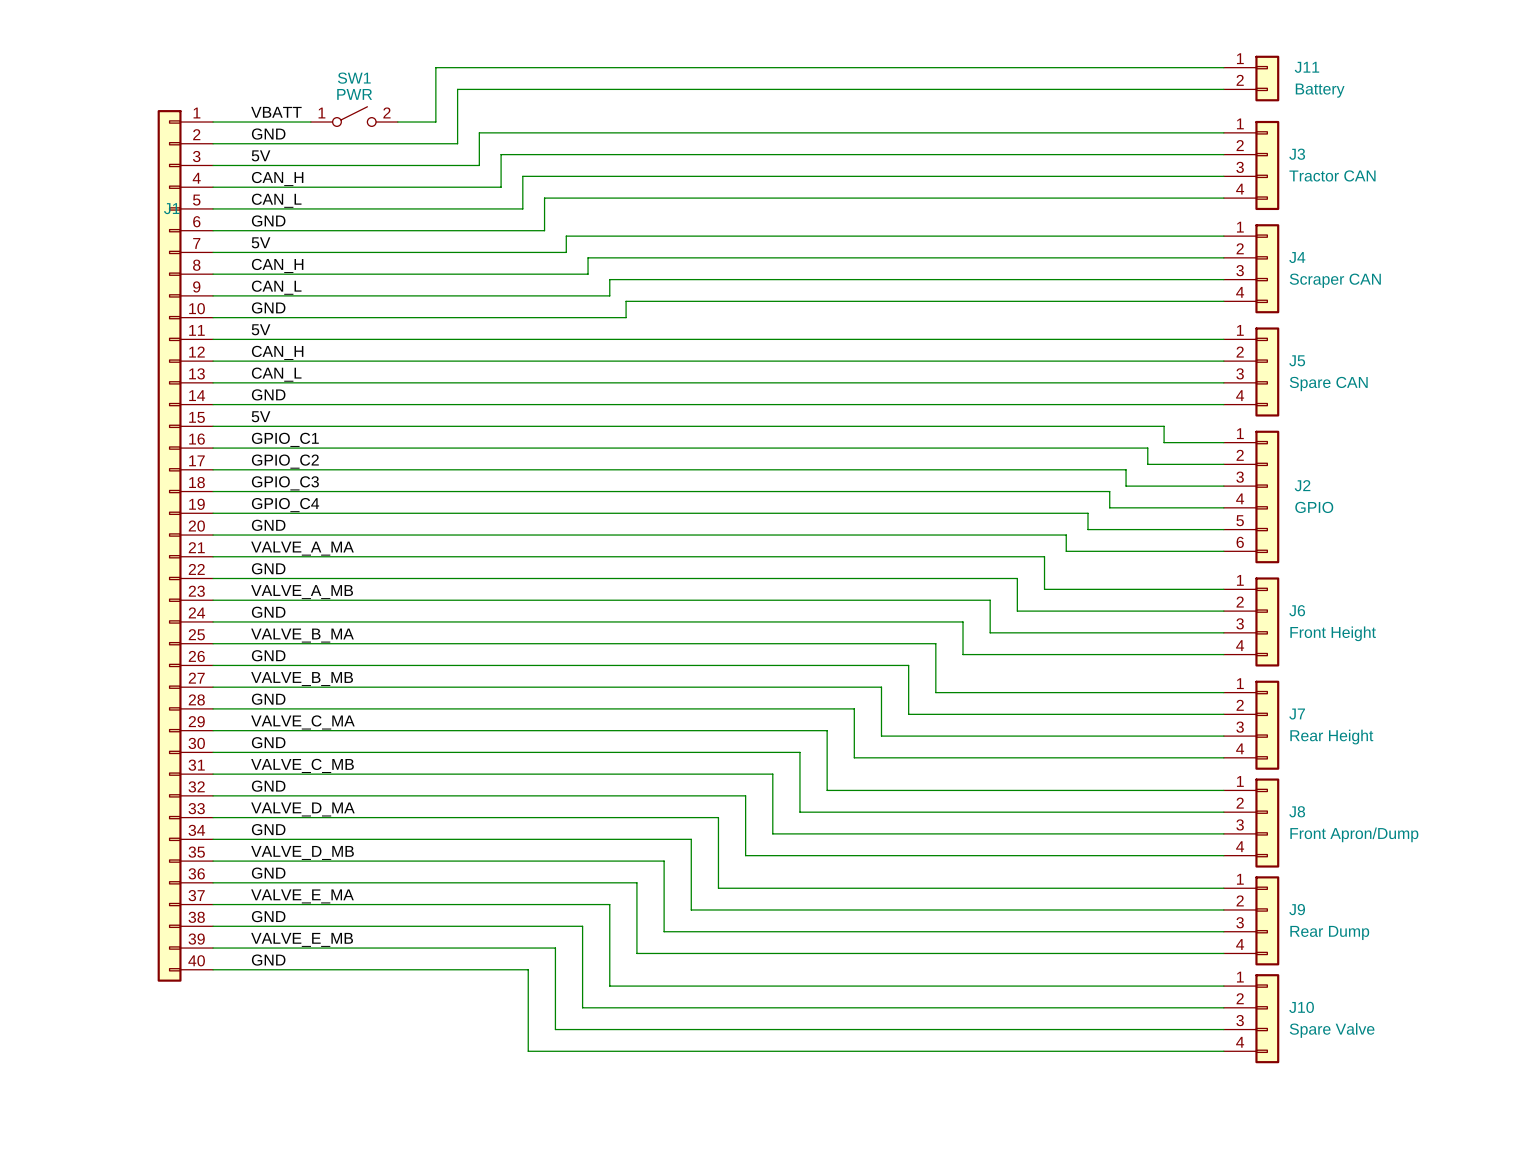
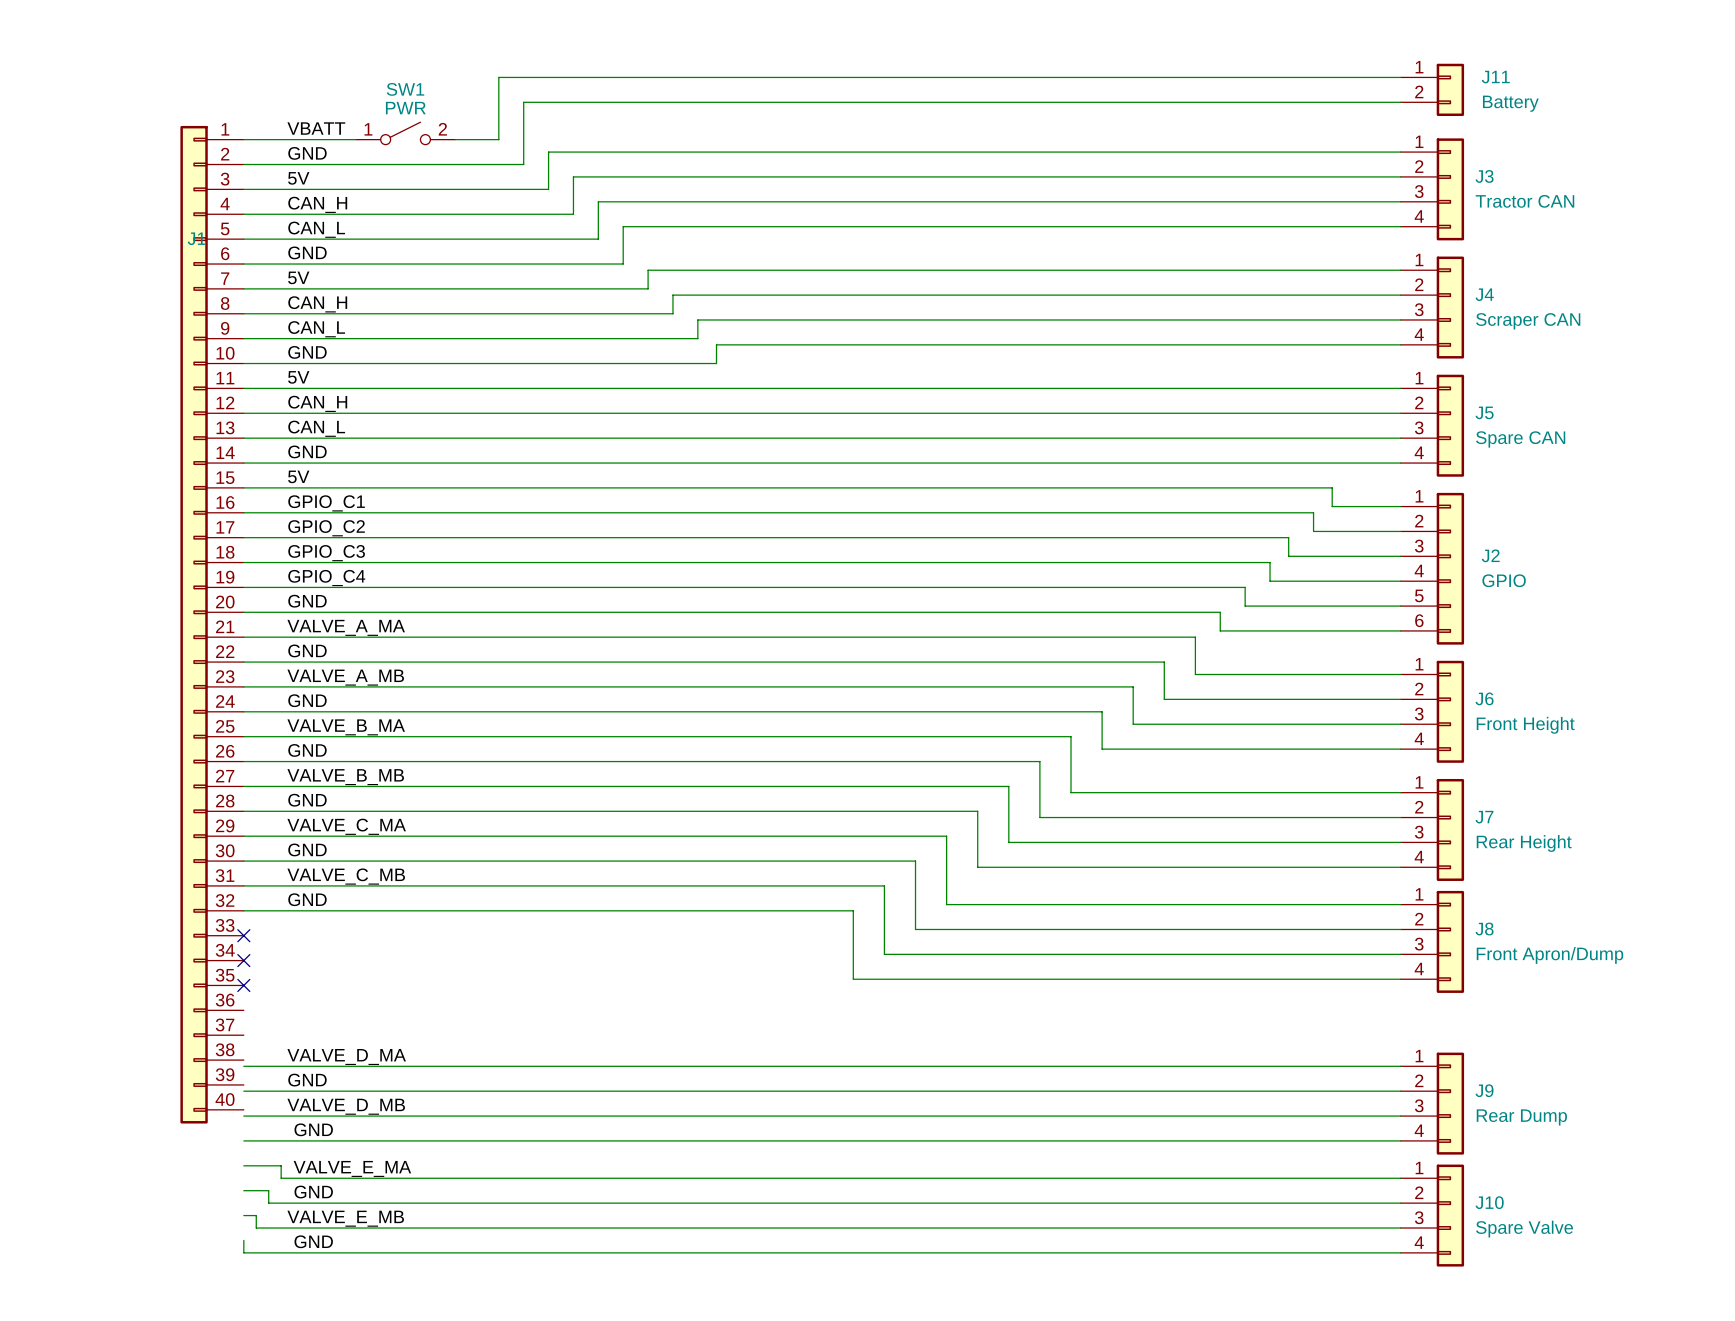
label position: VALVE_D_MA (302, 809) -> VALVE_D_MA (346, 1057)
wire: (213, 817) (718, 817) (718, 888) (1223, 888) -> none
no-connect mark: none -> (243, 935)
label: GND (268, 829) -> none
wire: (213, 839) (691, 839) (691, 909) (1223, 909) -> none
no-connect mark: none -> (243, 960)
label position: VALVE_D_MB (302, 852) -> VALVE_D_MB (346, 1106)
wire: (213, 861) (664, 861) (664, 931) -> (243, 1066) (760, 1066)
no-connect mark: none -> (243, 985)
label: GND (268, 873) -> none
wire: (213, 882) (636, 882) (636, 953) -> (243, 1091) (728, 1091)
label position: VALVE_E_MA (302, 896) -> VALVE_E_MA (352, 1168)
wire: (213, 904) (609, 904) (609, 986) (1223, 986) -> none
label: GND (268, 916) -> none
J9 position: (1251, 920) -> (1432, 1103)
wire: (213, 926) (582, 926) (582, 1007) (1223, 1007) -> none
label position: VALVE_E_MB (302, 939) -> VALVE_E_MB (345, 1218)
wire: (213, 948) (555, 948) (555, 1029) -> (243, 1165) (281, 1165) (281, 1178) (635, 1178)
label position: GND (268, 960) -> GND (307, 1080)
wire: (213, 969) (528, 969) (528, 1051) -> (243, 1190) (268, 1190) (268, 1203) (604, 1203)
wire: none -> (243, 1116) (1400, 1116)
label: none -> GND (313, 1129)
wire: none -> (243, 1140) (1400, 1140)
J10 position: (1251, 1018) -> (1432, 1215)
label: none -> GND (313, 1192)
wire: none -> (243, 1215) (256, 1215) (256, 1228) (1400, 1228)
wire: none -> (243, 1240) (243, 1252) (1400, 1252)
label: none -> GND (313, 1241)

